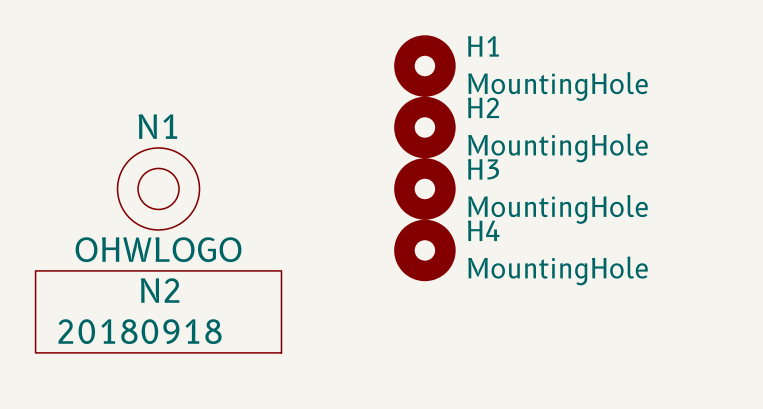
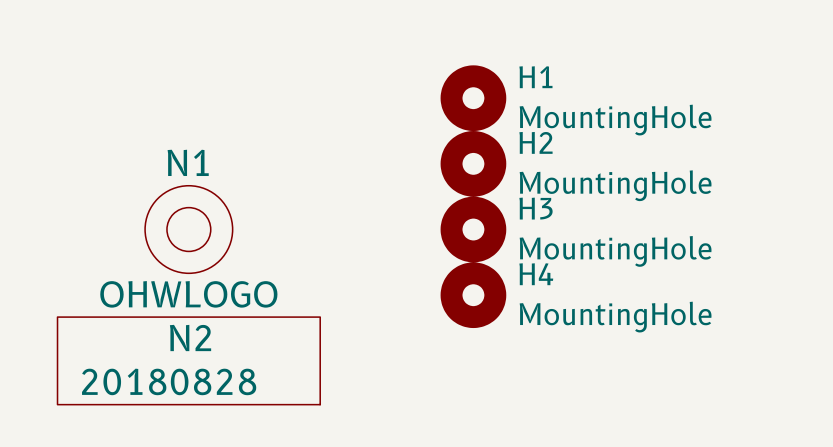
N2 value: 20180918 (140, 331) -> 20180828 (169, 381)

